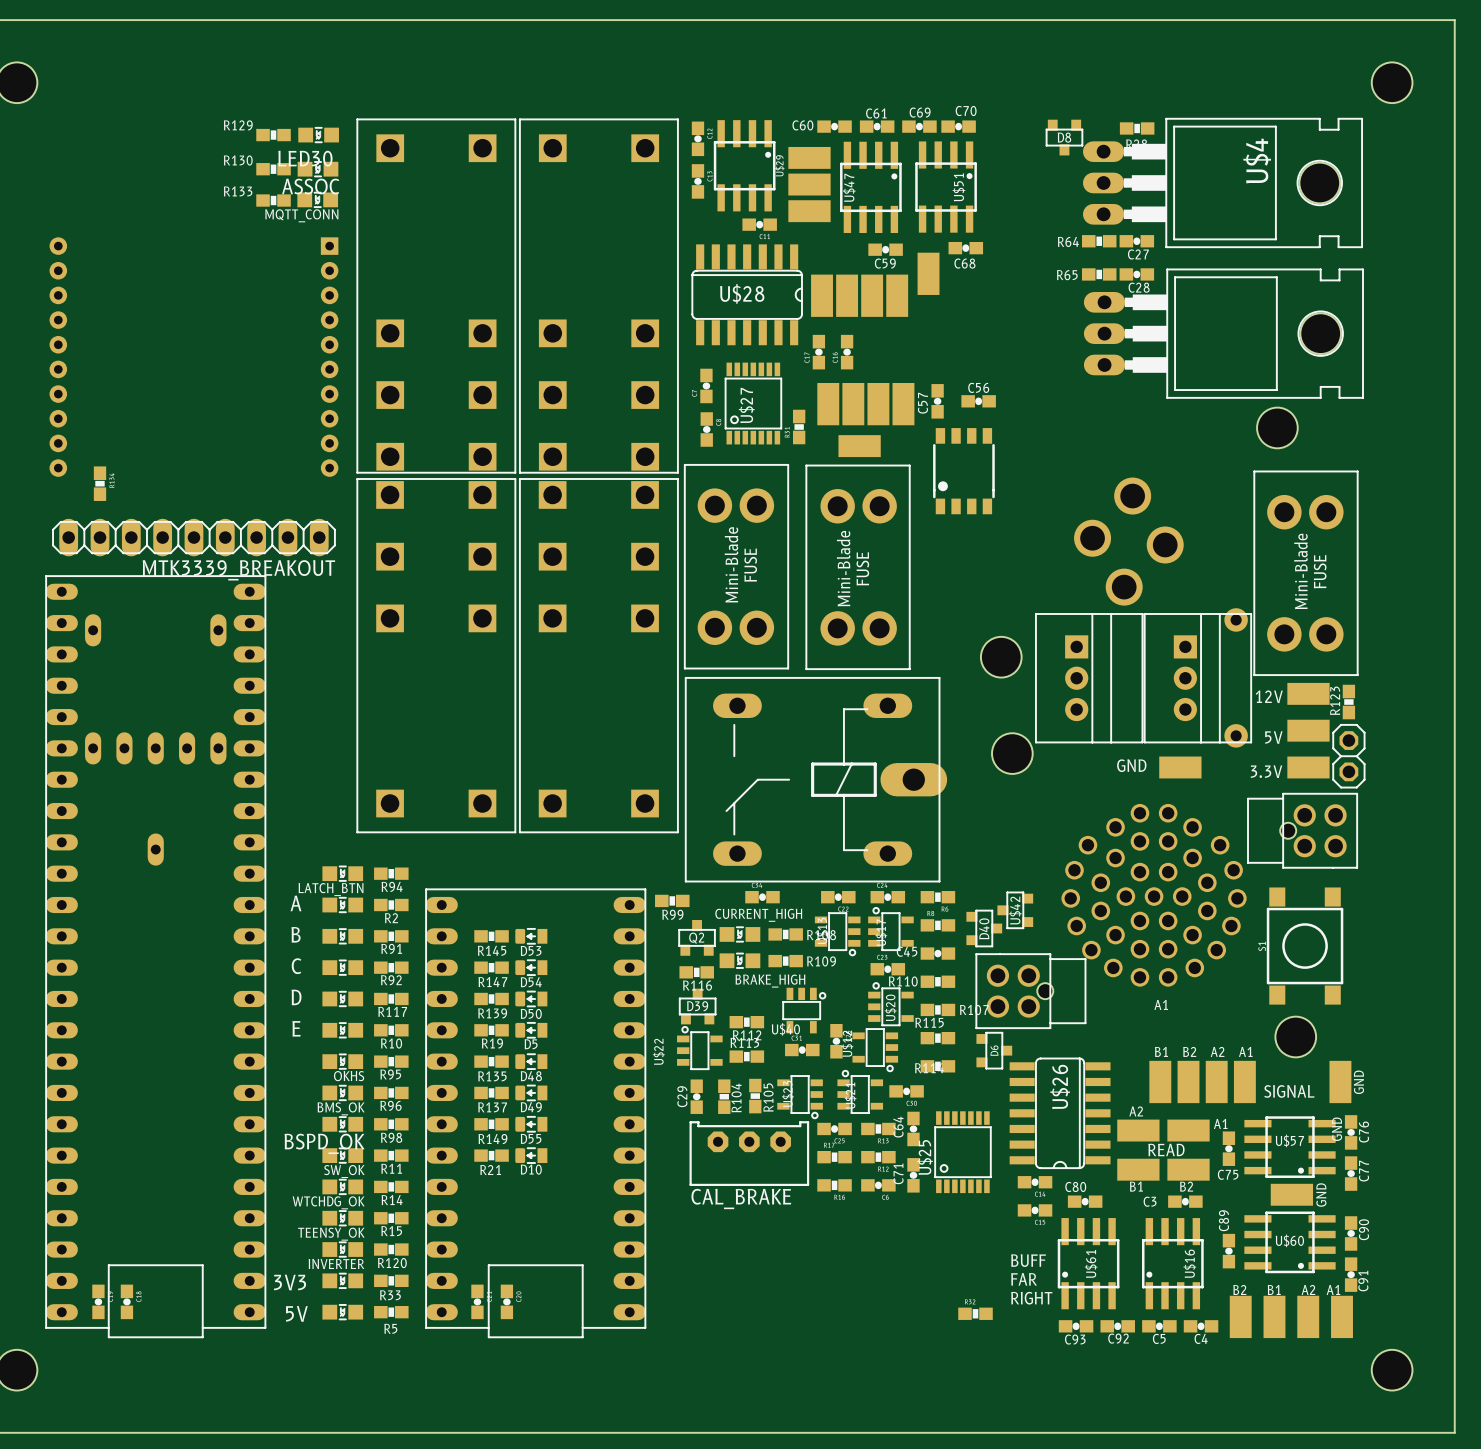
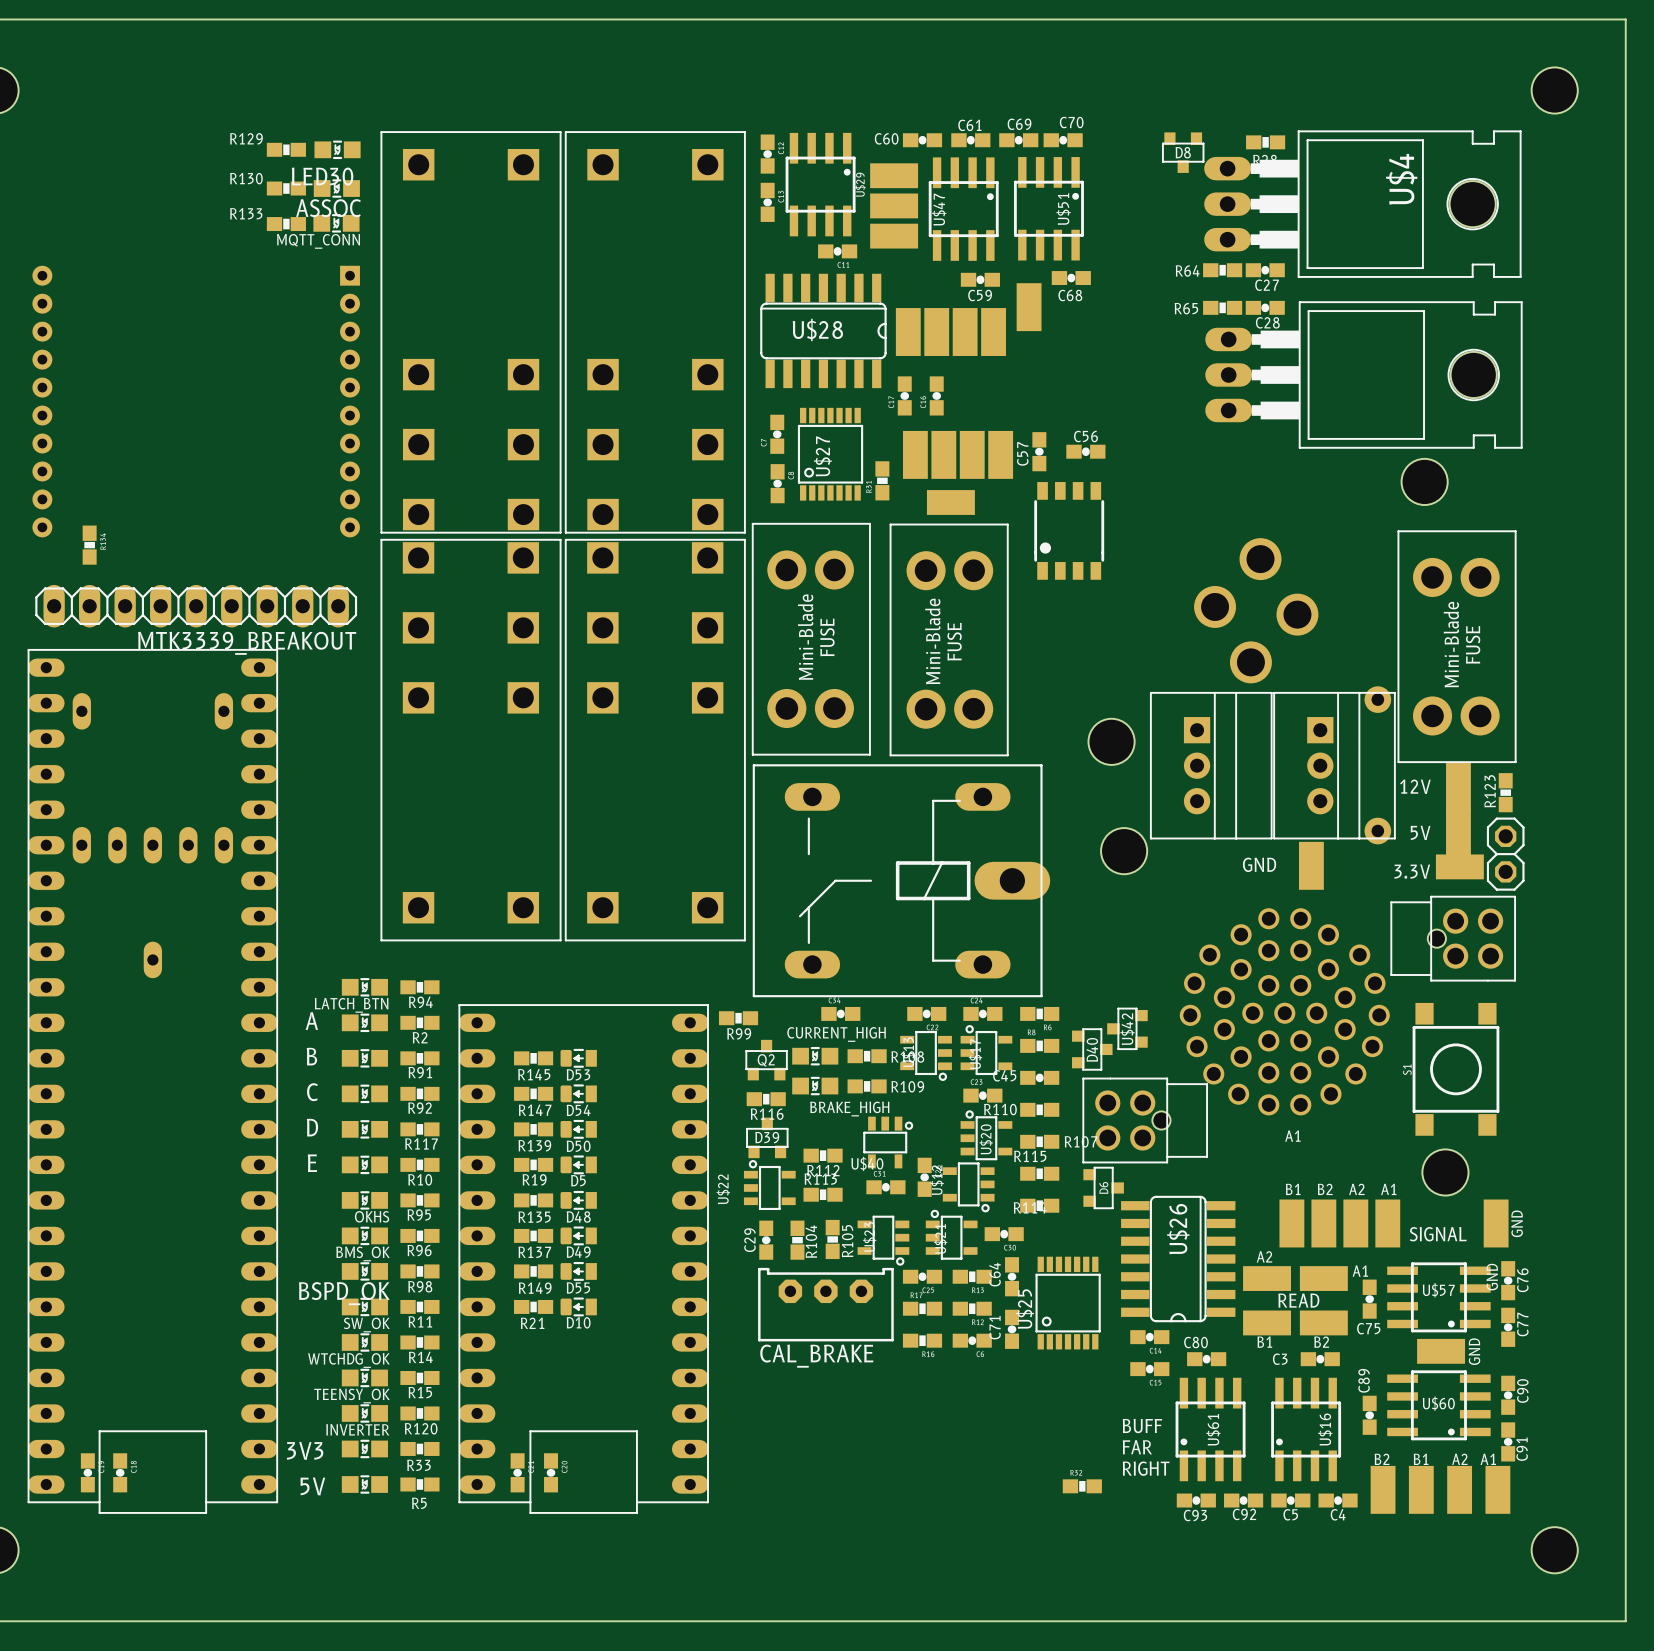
part rotation: 0° (1308, 693) -> 90° clockwise (1458, 786)
part rotation: 0° (1308, 730) -> 90° clockwise (1458, 833)
part rotation: 0° (1180, 767) -> 90° clockwise (1311, 865)

